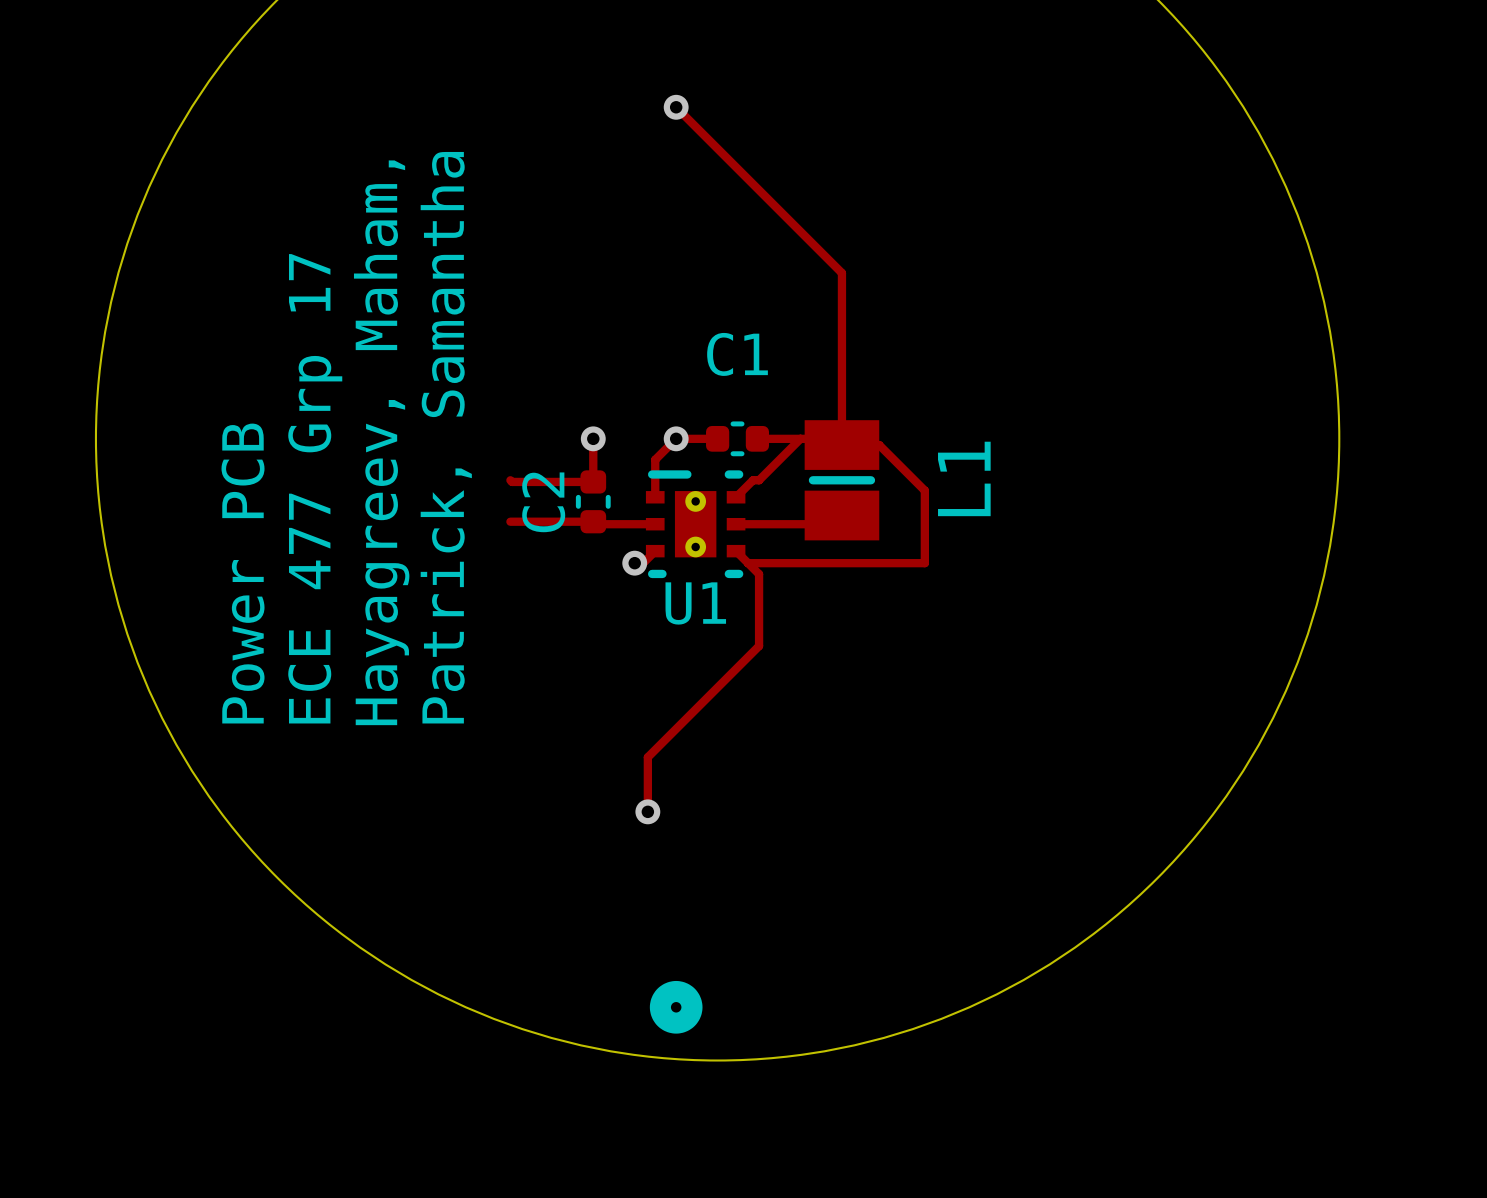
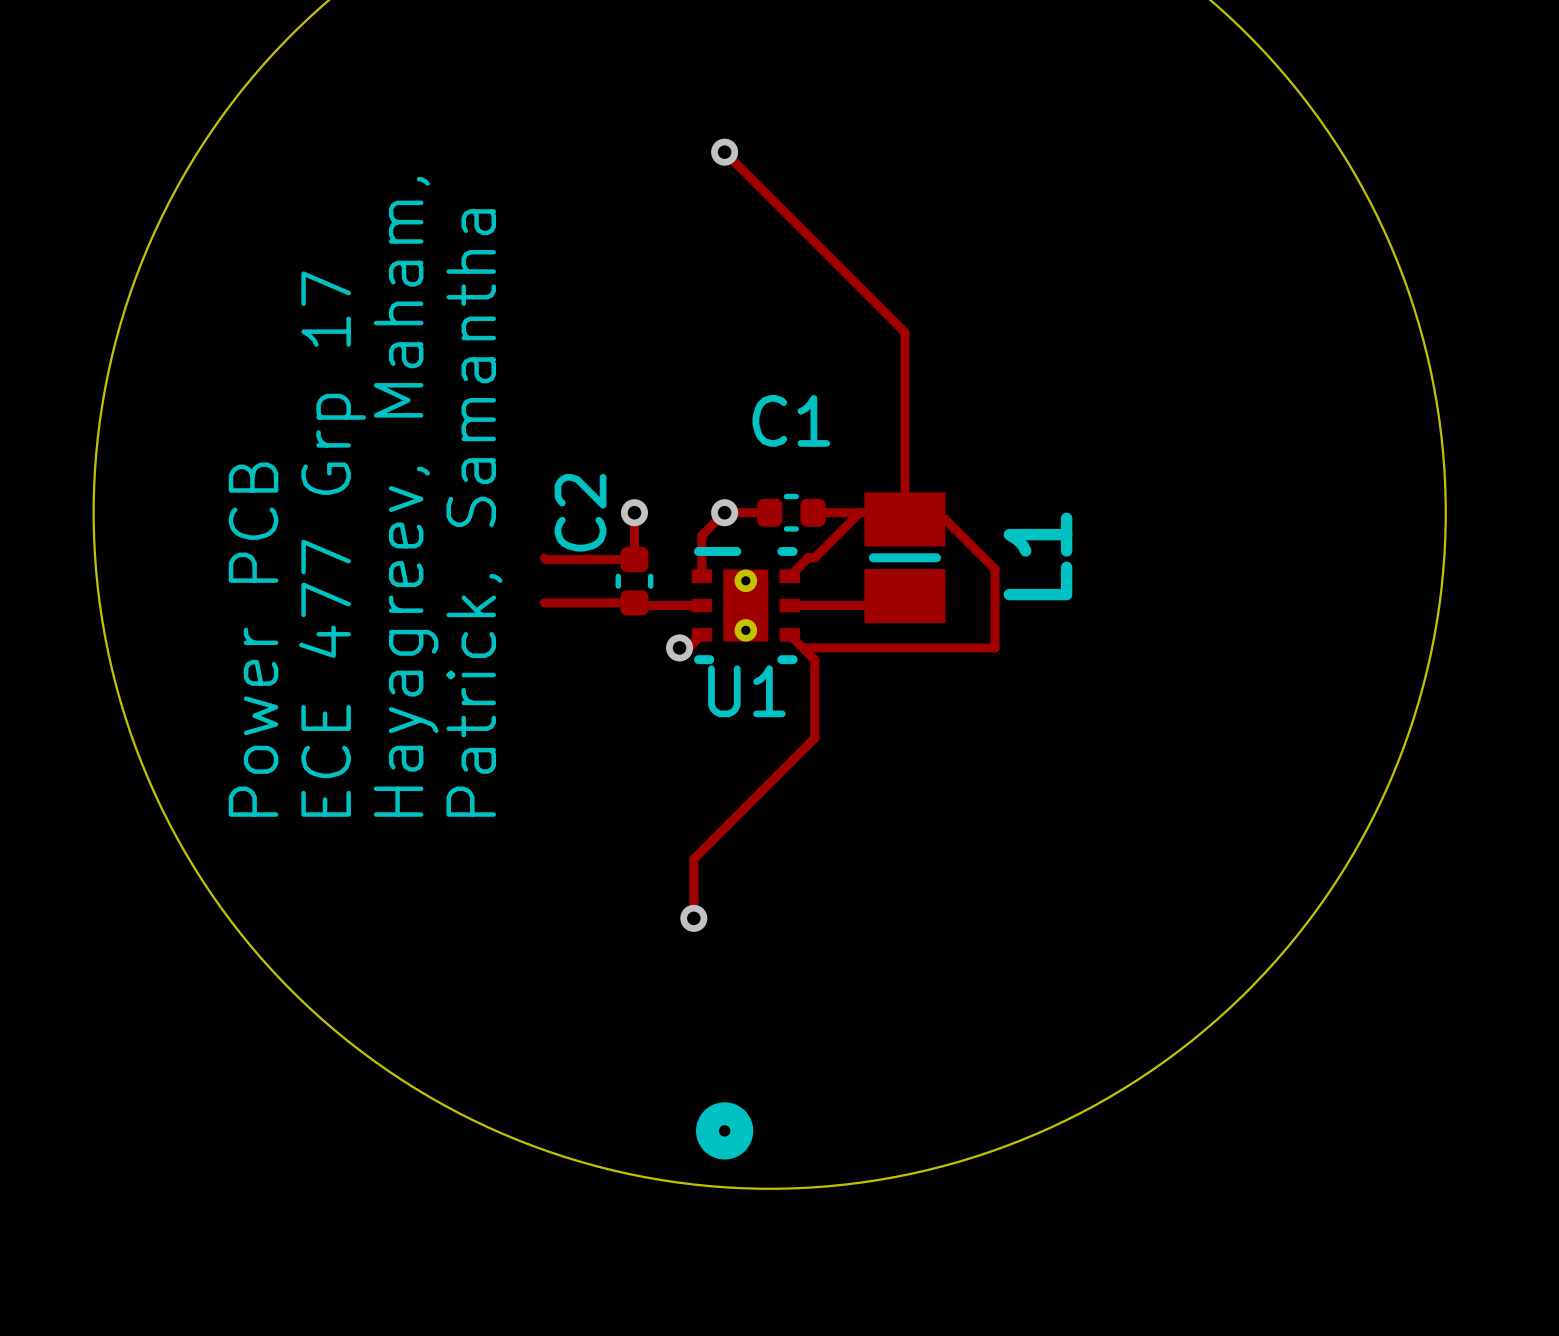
C2 name position: C2 (543, 502) -> C2 (580, 512)

